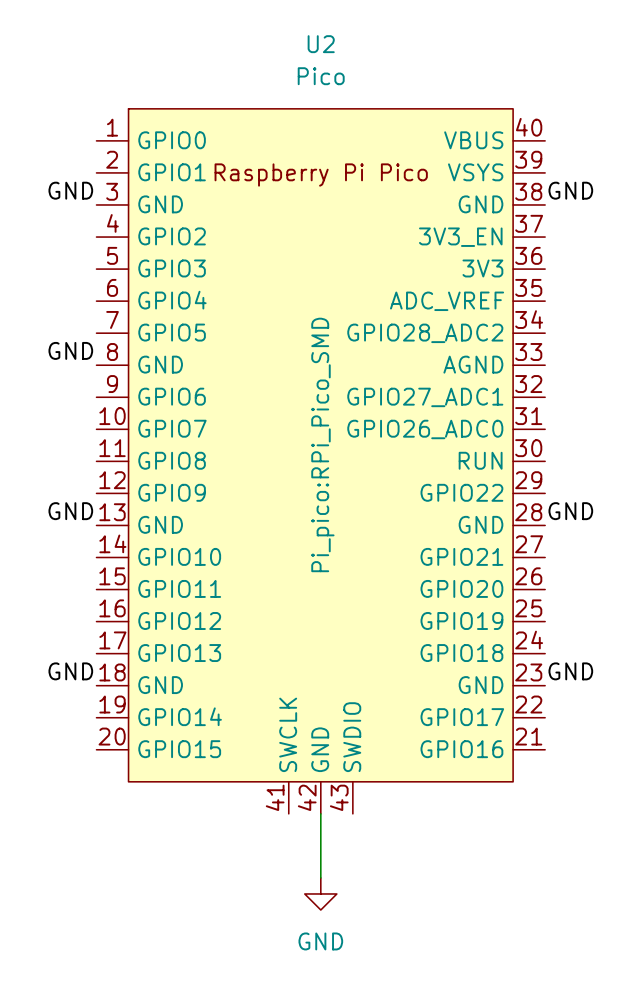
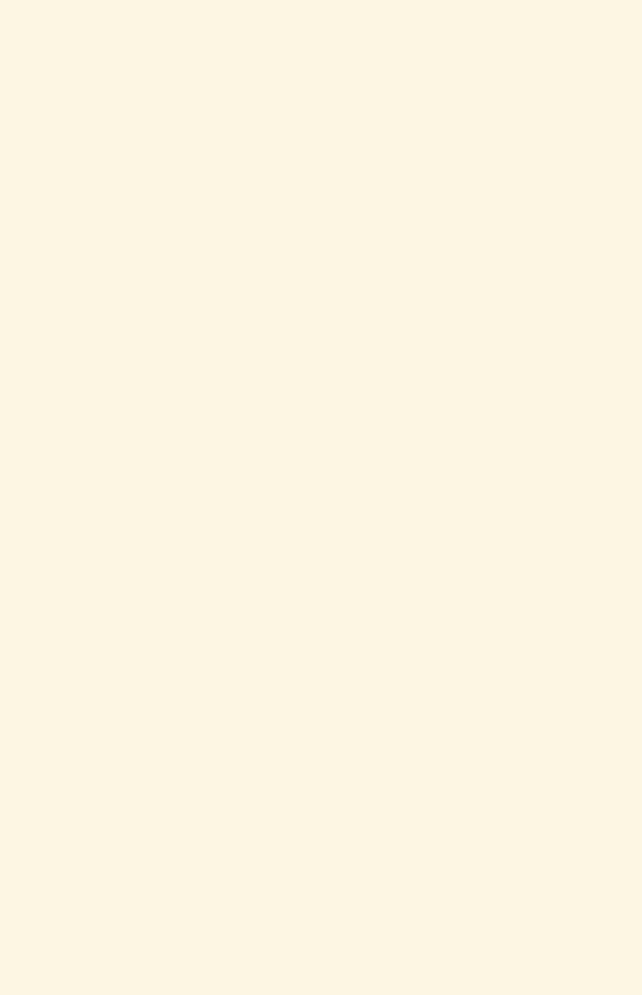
label: GND (70, 190) -> none
label: GND (570, 190) -> none
label: GND (70, 350) -> none
U2: Pico (320, 461) -> none
label: GND (70, 511) -> none
label: GND (570, 511) -> none
label: GND (70, 671) -> none
label: GND (570, 671) -> none
wire: (320, 813) (320, 877) -> none
power symbol: GND (320, 893) -> none

